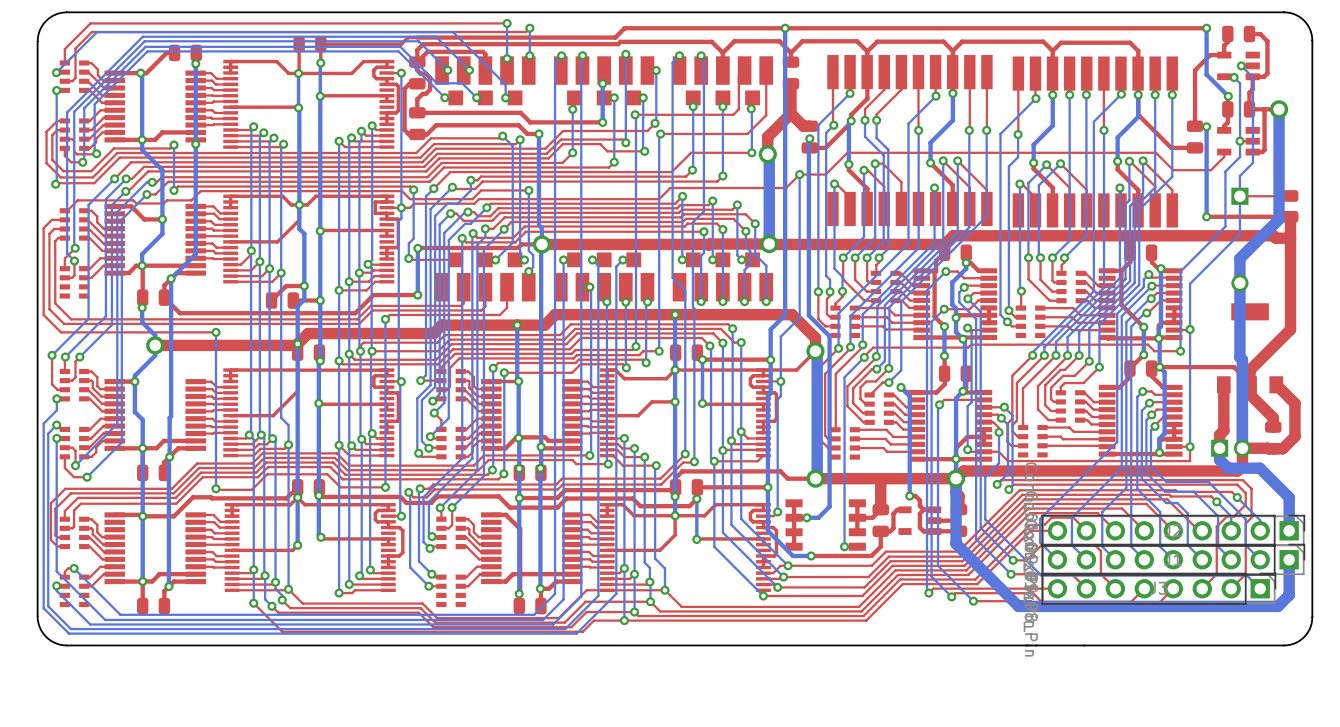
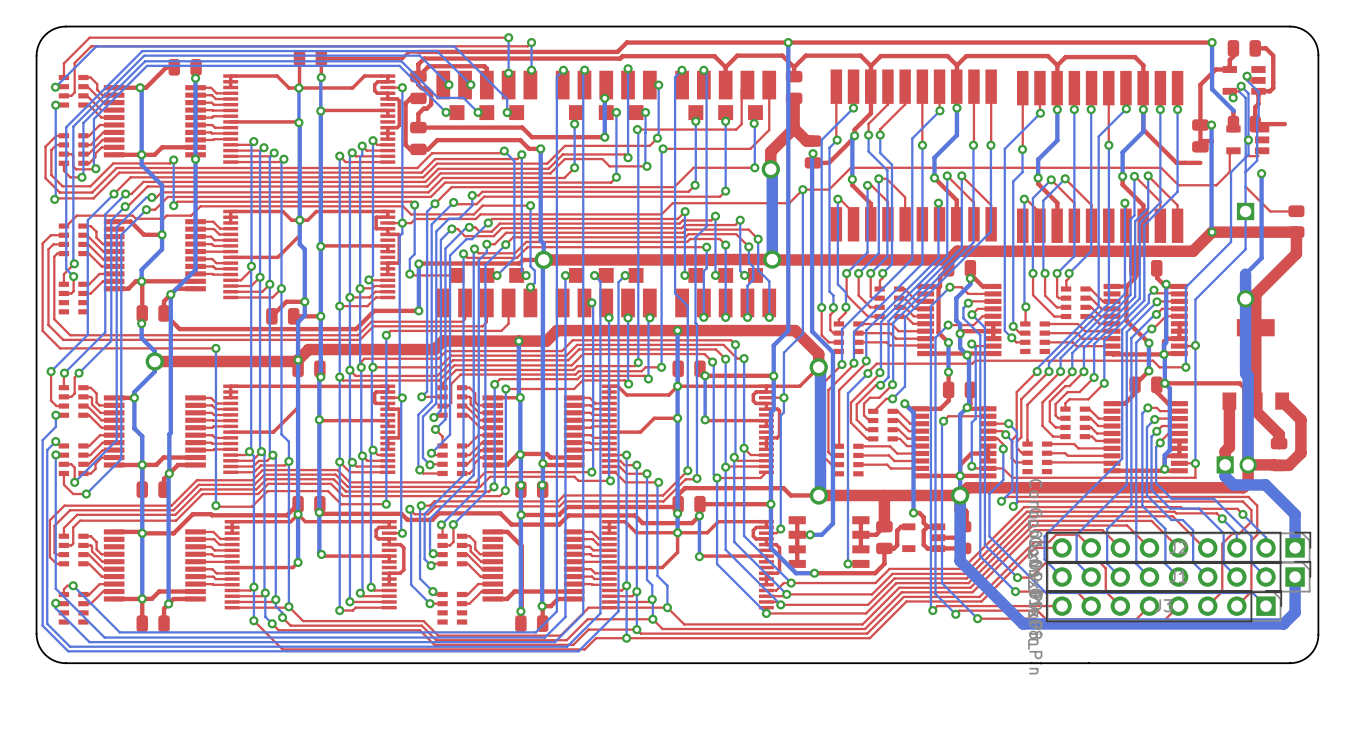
via: none -> (1247, 76)
via: (1241, 65) -> none
bottom track: none -> (1241, 86) (1248, 93) (1248, 154) (1231, 172) (1231, 186)
via: none -> (1241, 86)
via: (1234, 77) -> none
via: none -> (1233, 97)
via: (1228, 96) -> none
bottom track: (1252, 101) (1252, 162) (1239, 175) -> (1258, 116) (1257, 160) (1245, 172)
top track: (1264, 109) (1264, 149) (1262, 152) (1252, 152) -> none
bottom track: (1279, 109) (1279, 219) (1255, 242) -> (1261, 173) (1261, 258)
via: (1279, 109) -> none
via: none -> (1211, 125)
top track: (1227, 114) (1227, 122) (1224, 125) (1224, 130) -> none
via: none -> (1248, 140)
bottom track: (1206, 126) (1206, 216) -> (1211, 125) (1212, 232)
via: (1206, 126) -> none
top track: none -> (1233, 150) (1229, 154) (1229, 167)
part position: (1195, 137) -> (1200, 135)
part position: (1238, 141) -> (1247, 139)
via: (1240, 141) -> none
bottom track: (1239, 157) (1225, 171) -> (1245, 172) (1245, 191)
via: none -> (1261, 173)
top track: (1264, 196) (1239, 196) -> (1270, 211) (1245, 186)
top track: none -> (1212, 232) (1192, 251)
top track width: thin (1290, 216) (1206, 216) -> thick (1296, 232) (1212, 232)
top track: (1187, 235) (1273, 235) (1276, 238) (1290, 238) (1290, 329) (1250, 370) -> (1296, 253) (1255, 294) (1255, 386)
bottom track width: thick (1255, 242) (1239, 258) -> thin (1261, 258) (1245, 274)

